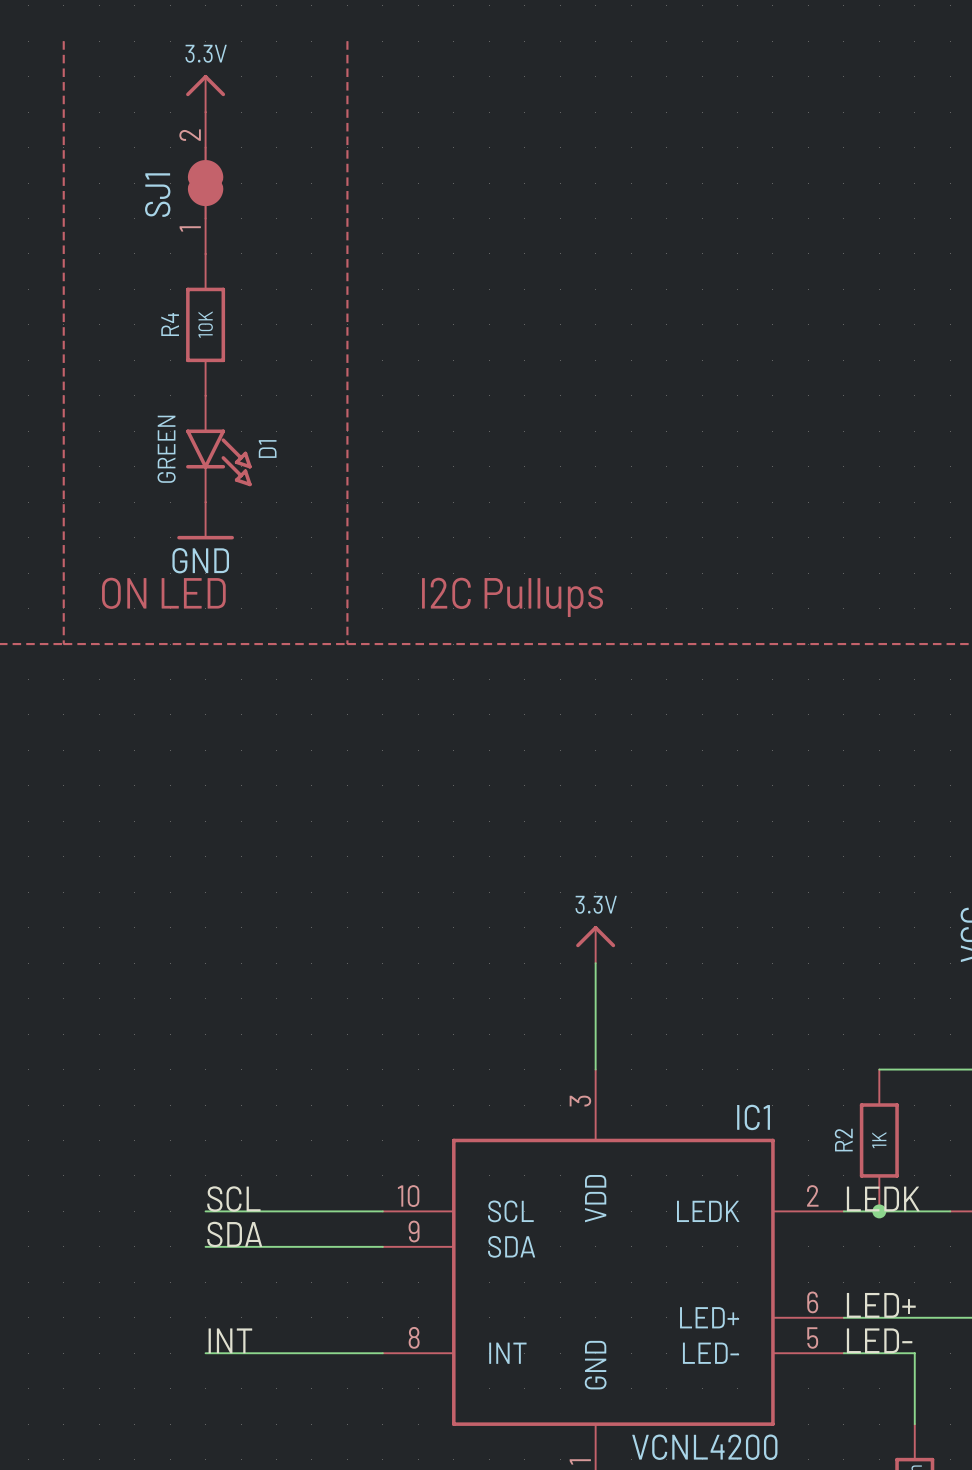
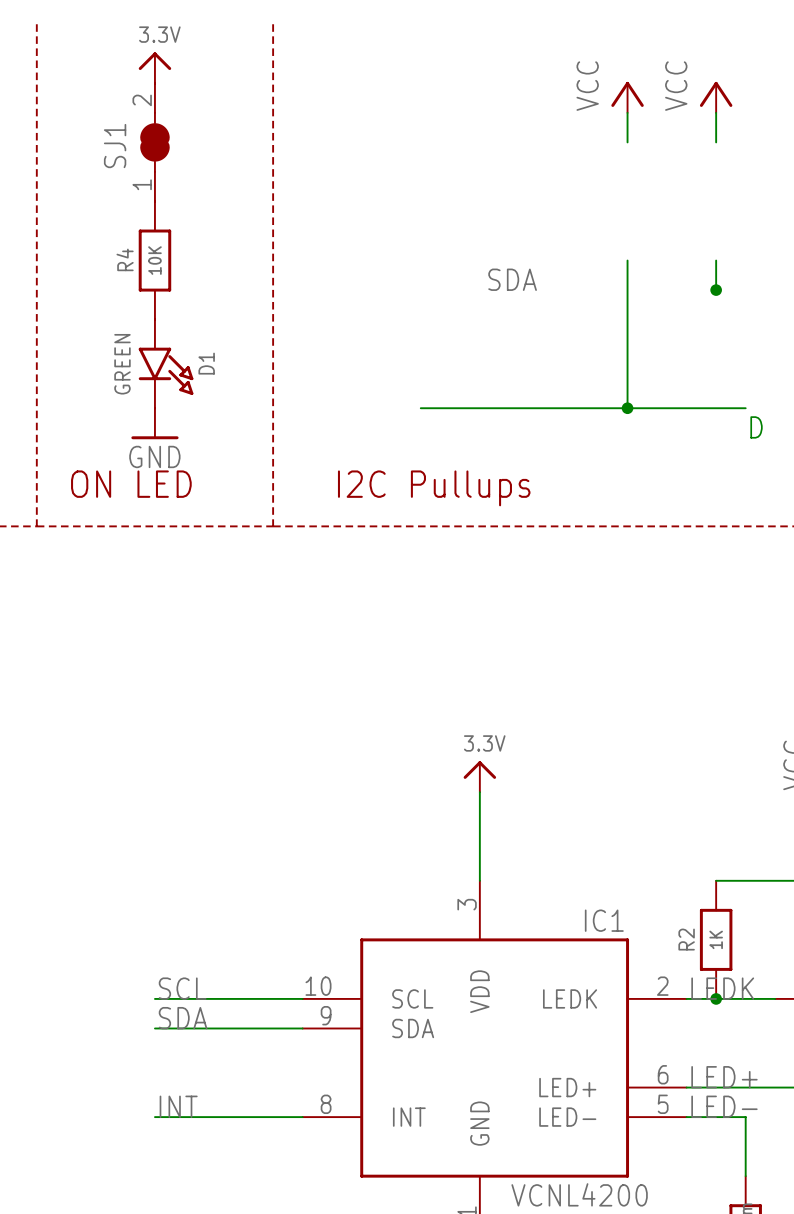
power symbol: none -> VCC (627, 97)
power symbol: none -> VCC (716, 97)
wire: none -> (627, 112) (627, 142)
wire: none -> (716, 112) (716, 142)
wire: none -> (627, 260) (627, 408)
wire: none -> (716, 260) (716, 290)
label: none -> SDA (512, 279)
junction: none -> (716, 290)
wire: none -> (420, 408) (745, 408)
junction: none -> (627, 408)
text: none -> D (756, 427)

